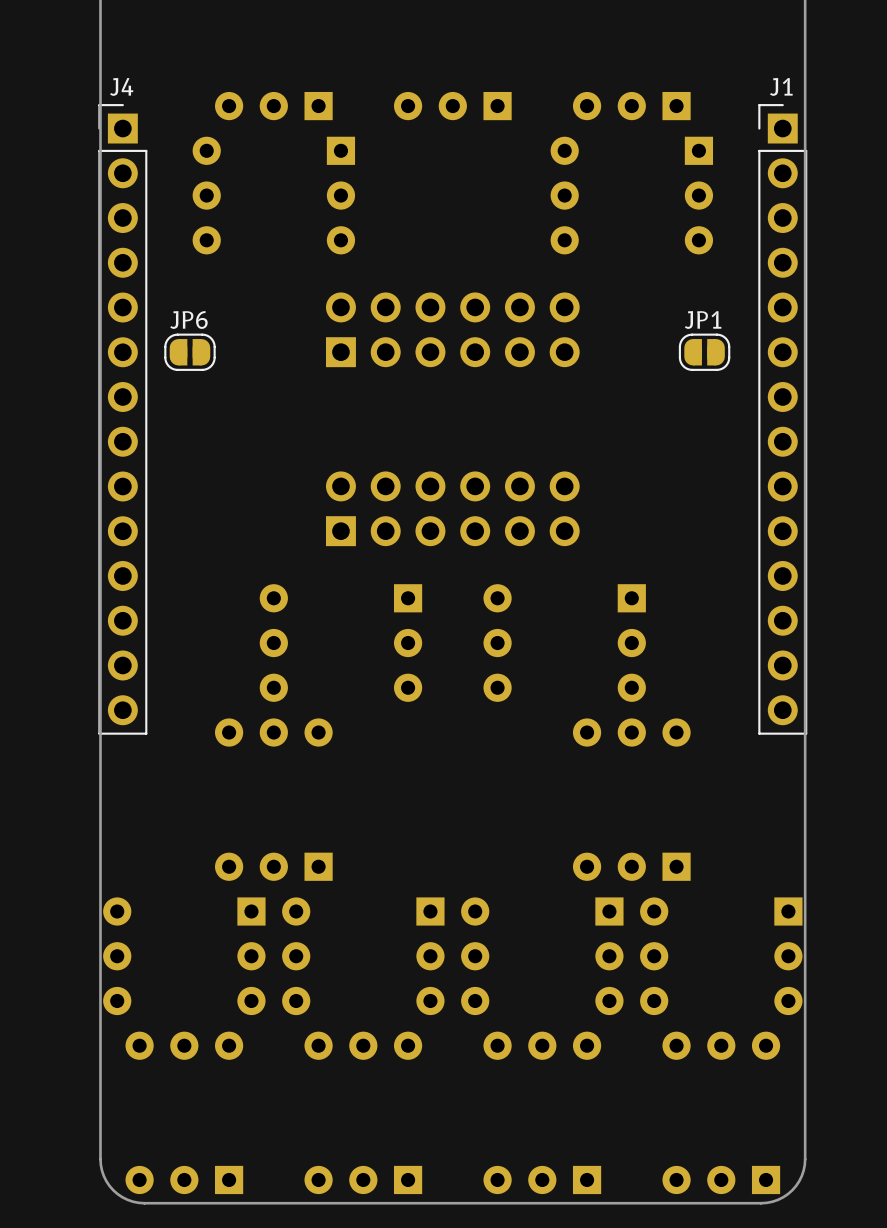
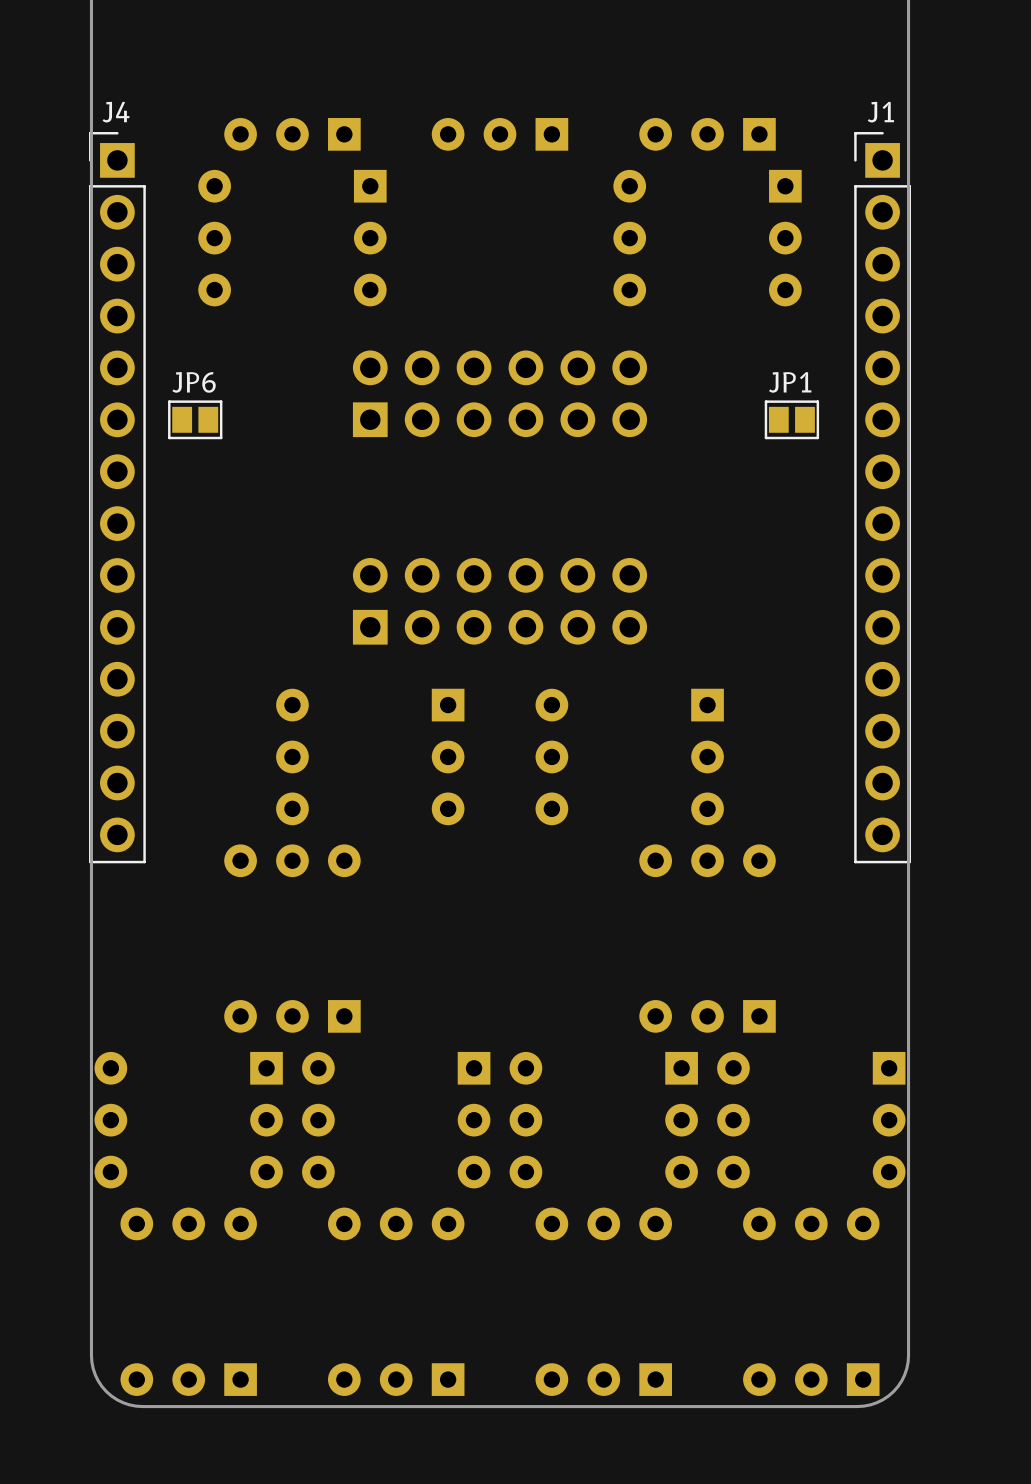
JP6 footprint: [164, 333, 216, 371] -> [168, 400, 223, 440]
JP1 footprint: [678, 333, 731, 371] -> [764, 400, 820, 440]

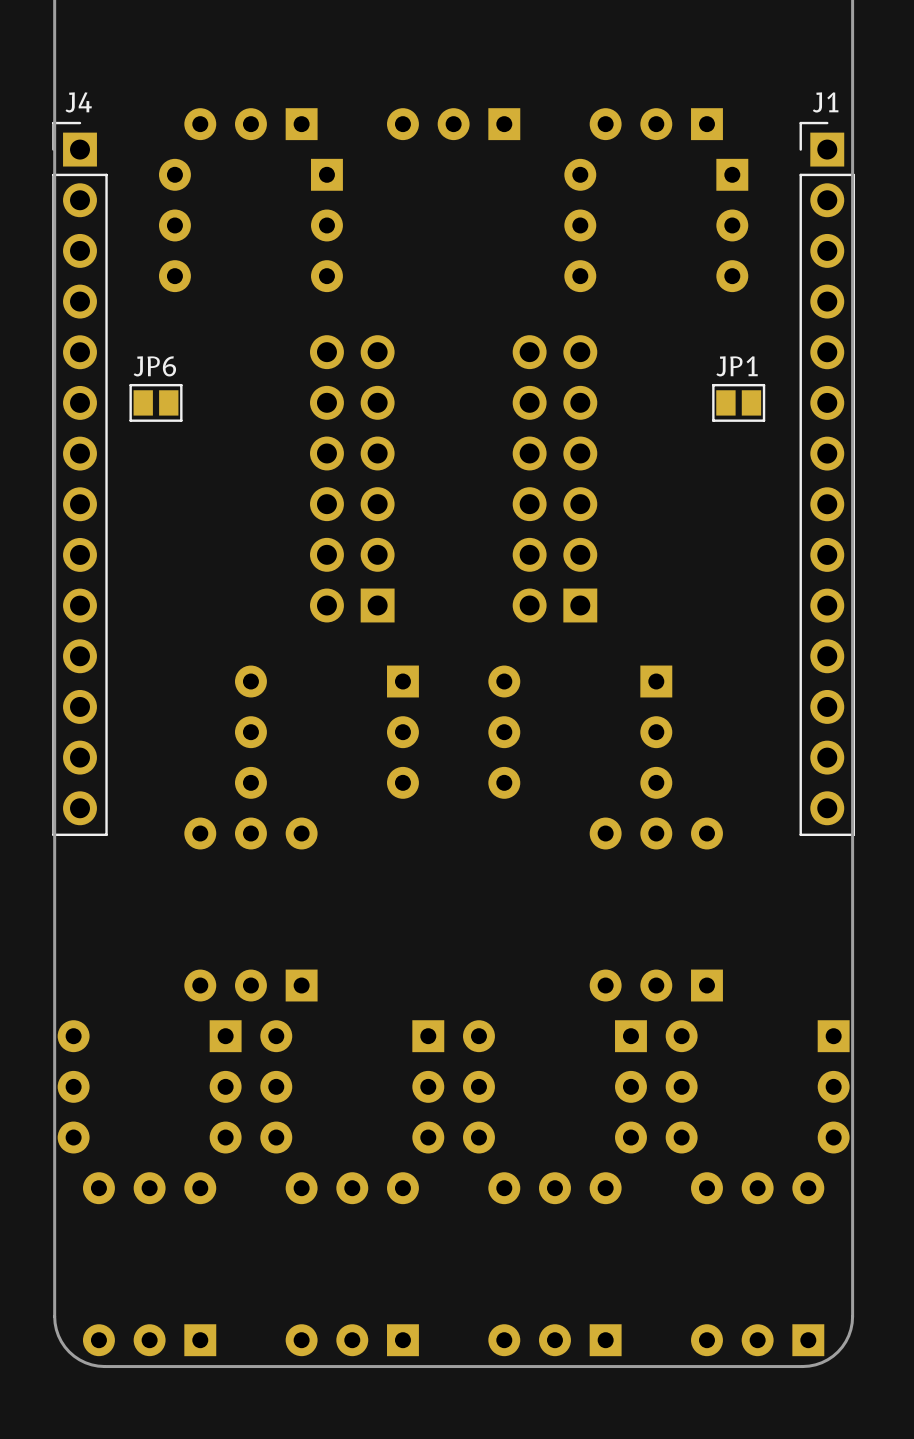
part: (500, 393) -> none
part: none -> (352, 478)
part: none -> (554, 478)
part: (500, 601) -> none

